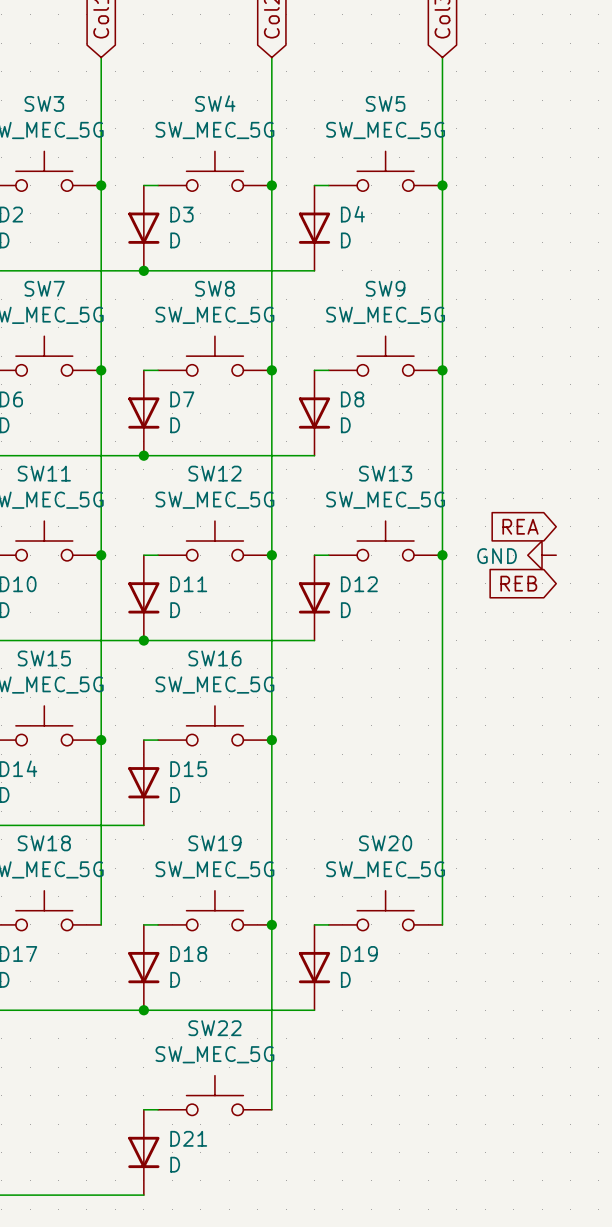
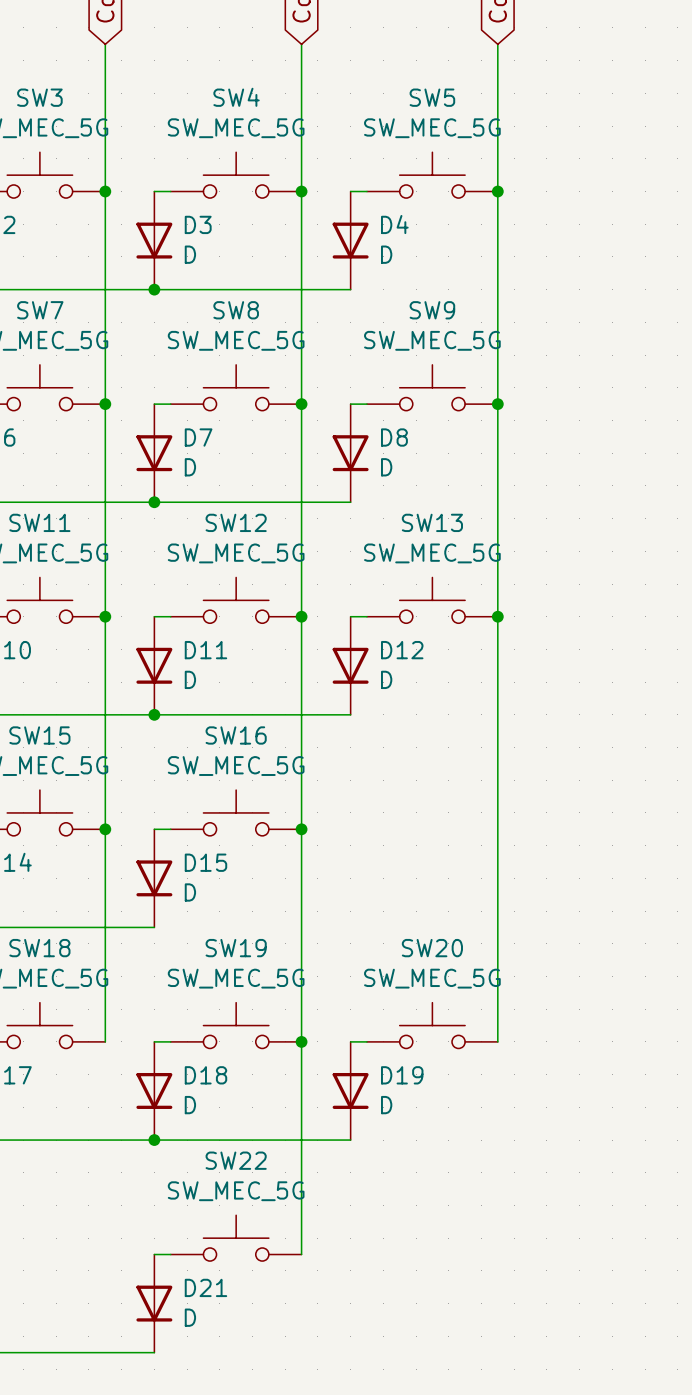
global label: REA (520, 526) -> none
power symbol: GND (542, 555) -> none
global label: REB (518, 583) -> none

